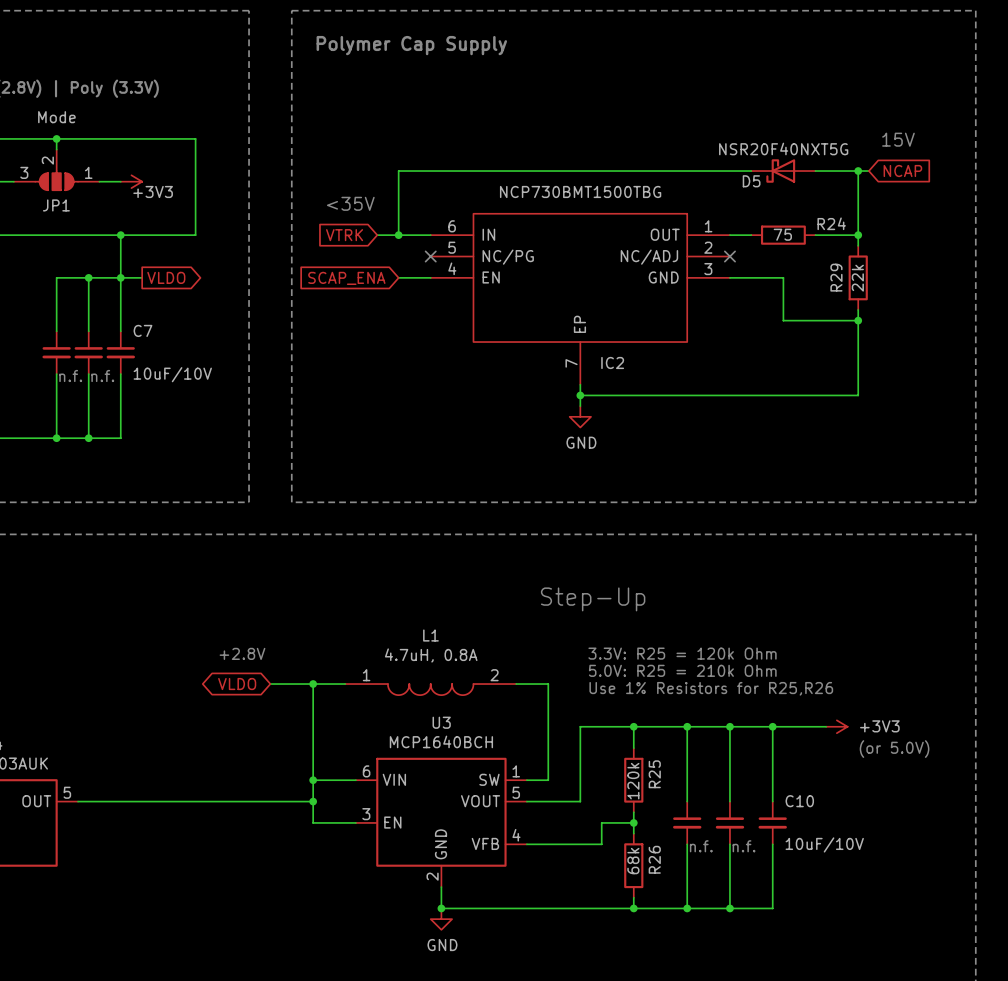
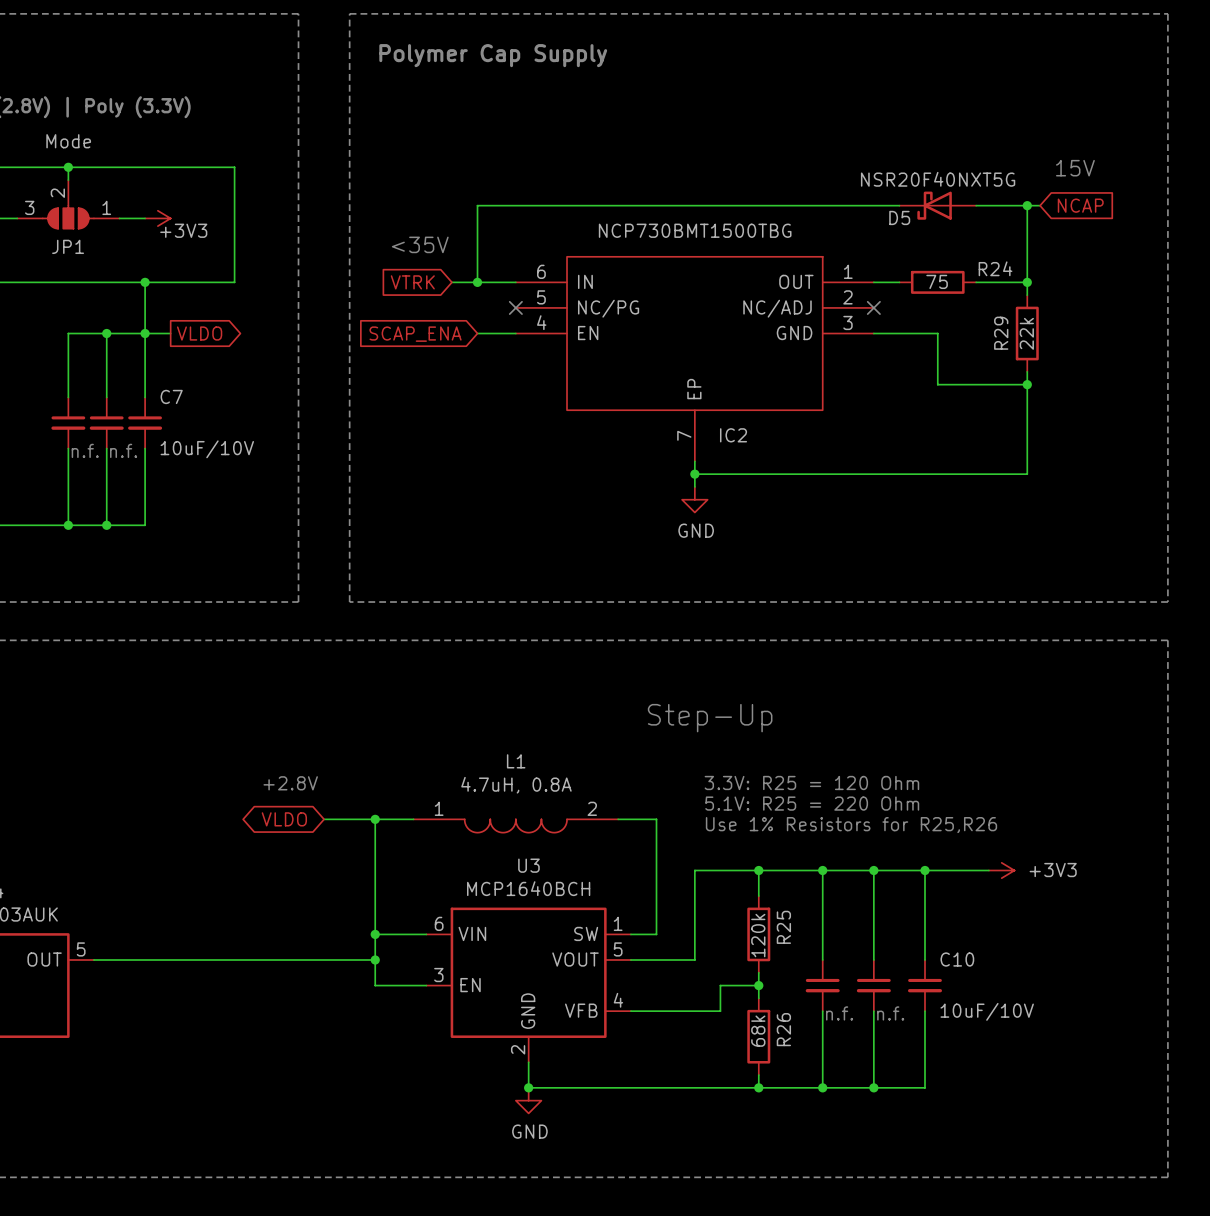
text: 3.3V: R25 = 120k Ohm (682, 653) -> 3.3V: R25 = 120 Ohm (811, 782)
text: 5.0V: R25 = 210k Ohm (682, 670) -> 5.1V: R25 = 220 Ohm (812, 803)
text: (or 5.0V) (894, 749) -> none

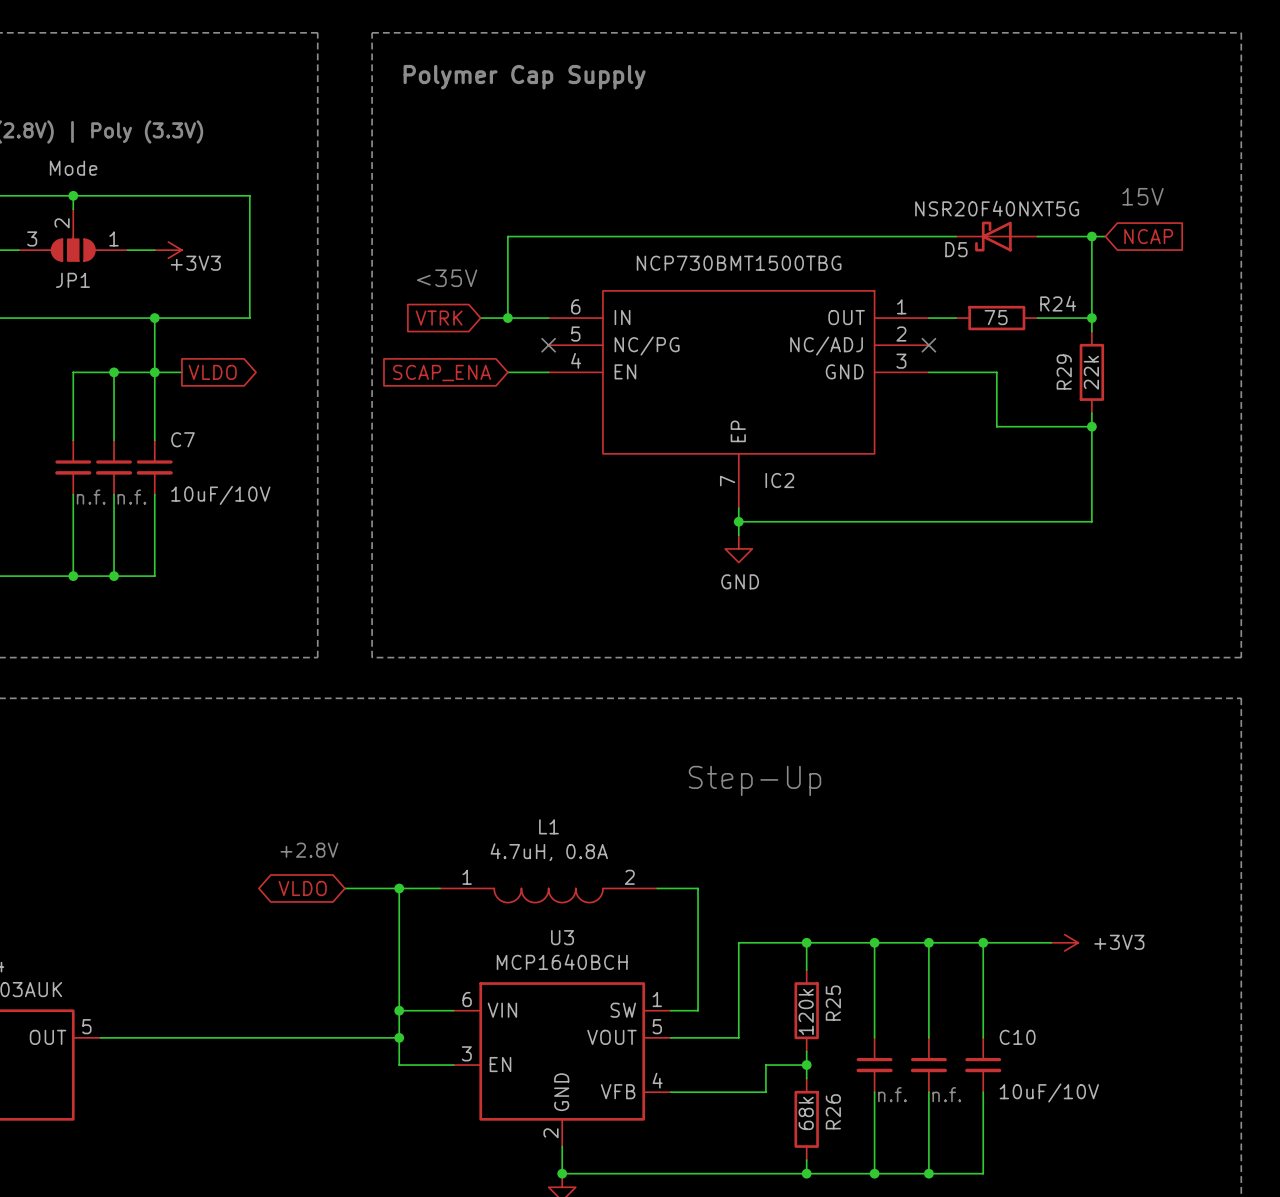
text: 3.3V: R25 = 120 Ohm (811, 782) -> none
text: 5.1V: R25 = 220 Ohm (812, 803) -> none
text: Use 1% Resistors for R25,R26 (851, 825) -> none

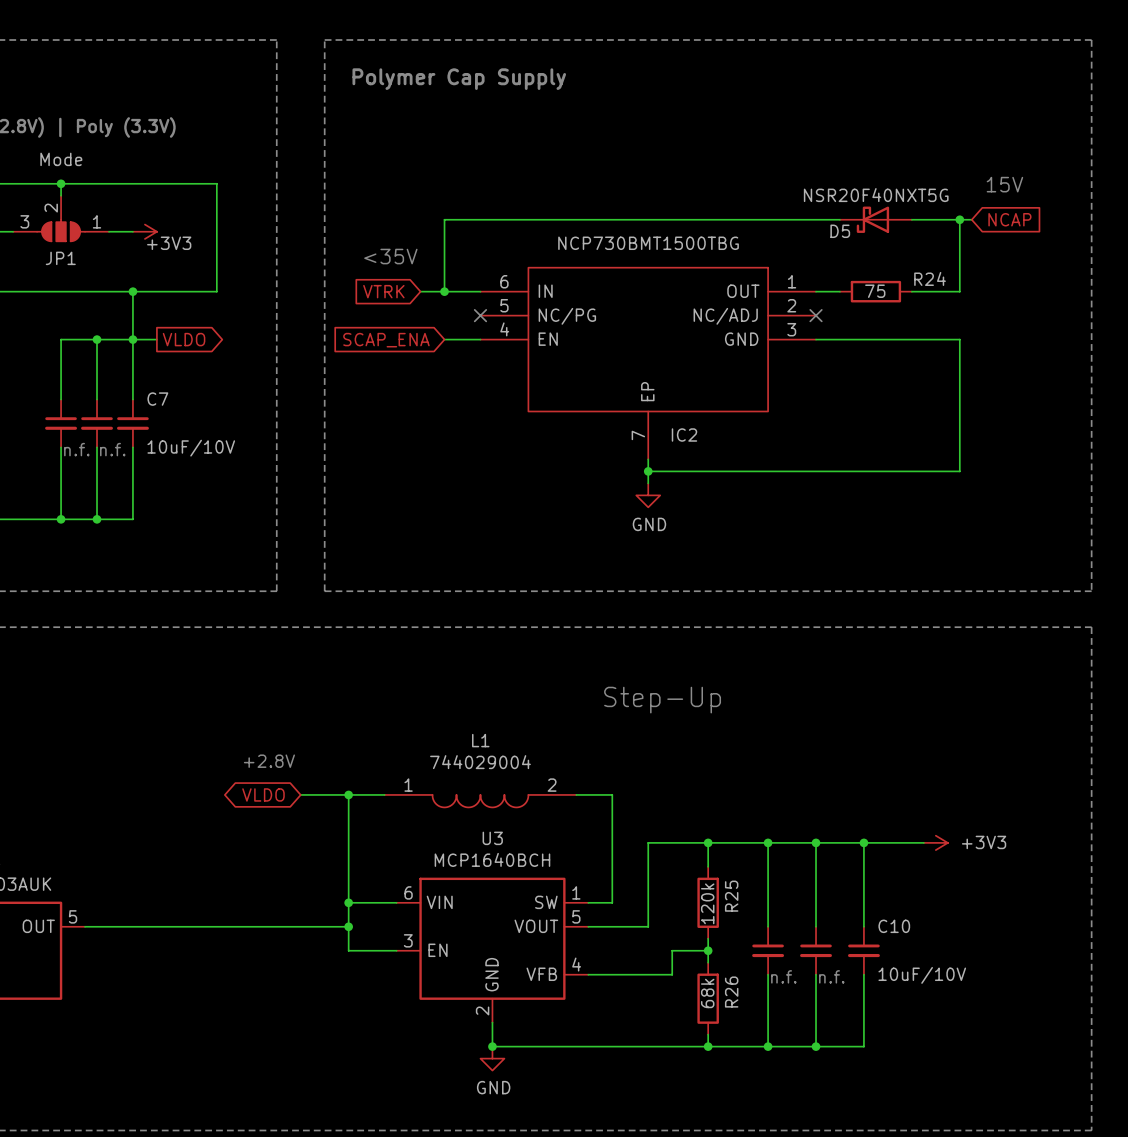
wire: (1091, 318) (1091, 331) -> none
junction: (1091, 318) -> none
wire: (996, 372) (996, 426) (1091, 426) -> (875, 339) (959, 339) (959, 375)
R29: 22k (1091, 372) -> none
junction: (1091, 426) -> none
L1 value: 4.7uH, 0.8A (549, 852) -> 744029004 (480, 762)

